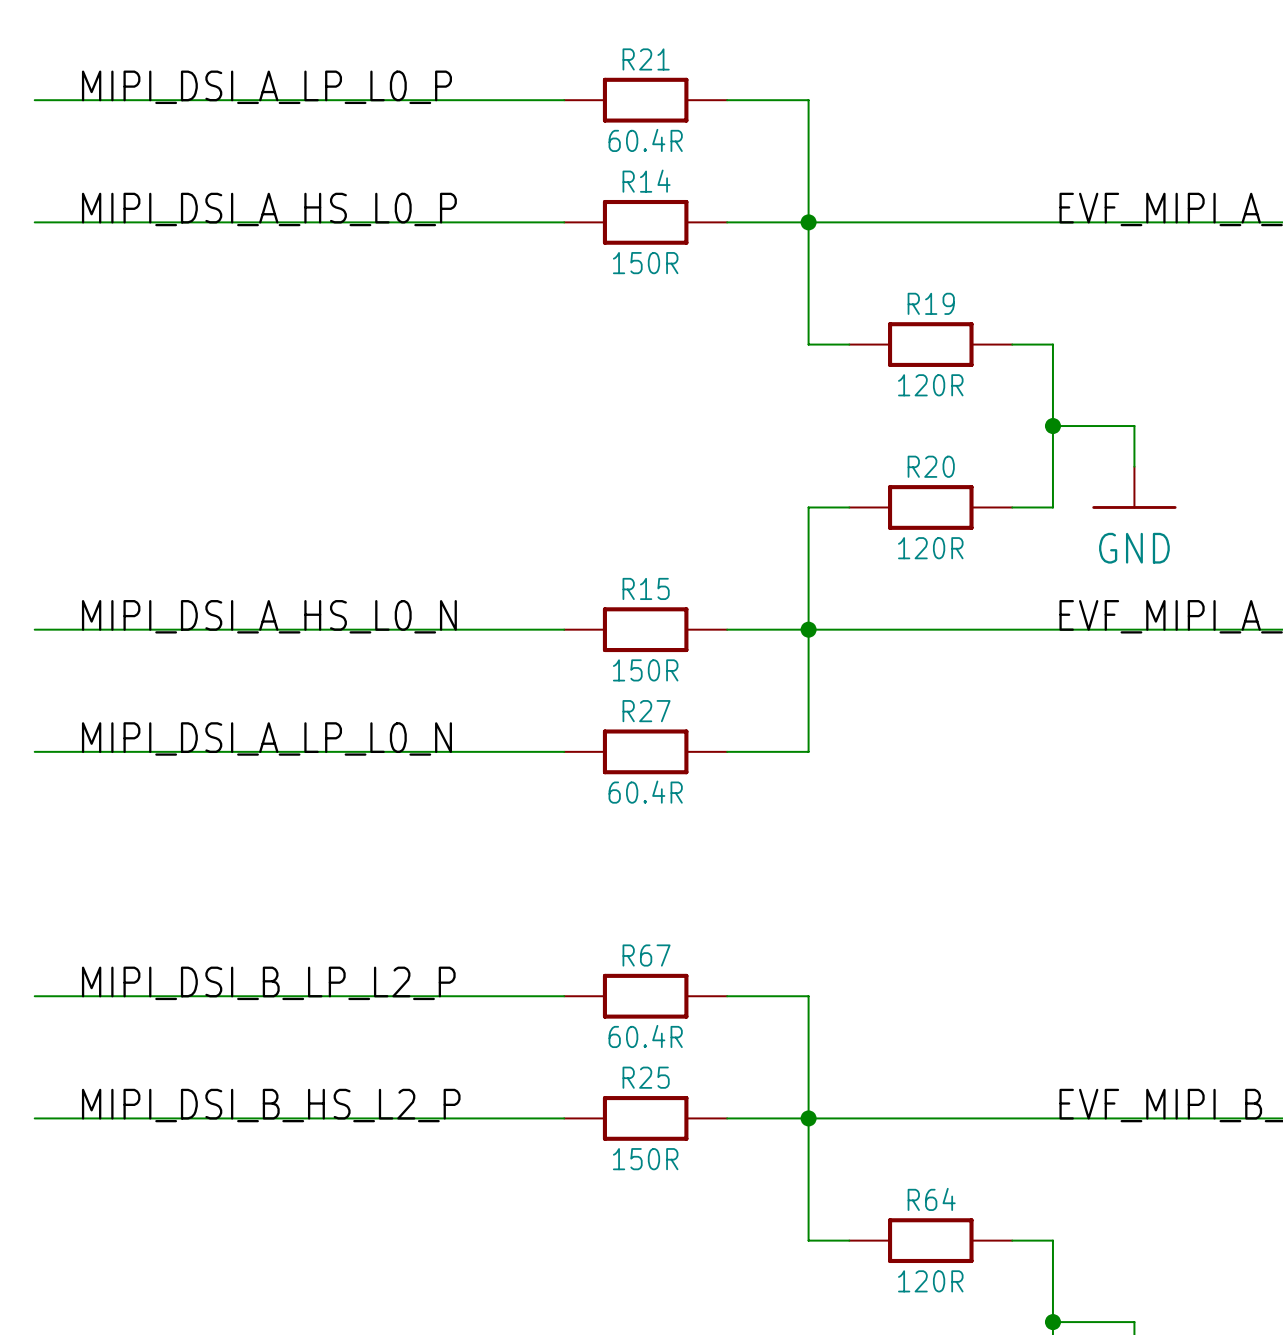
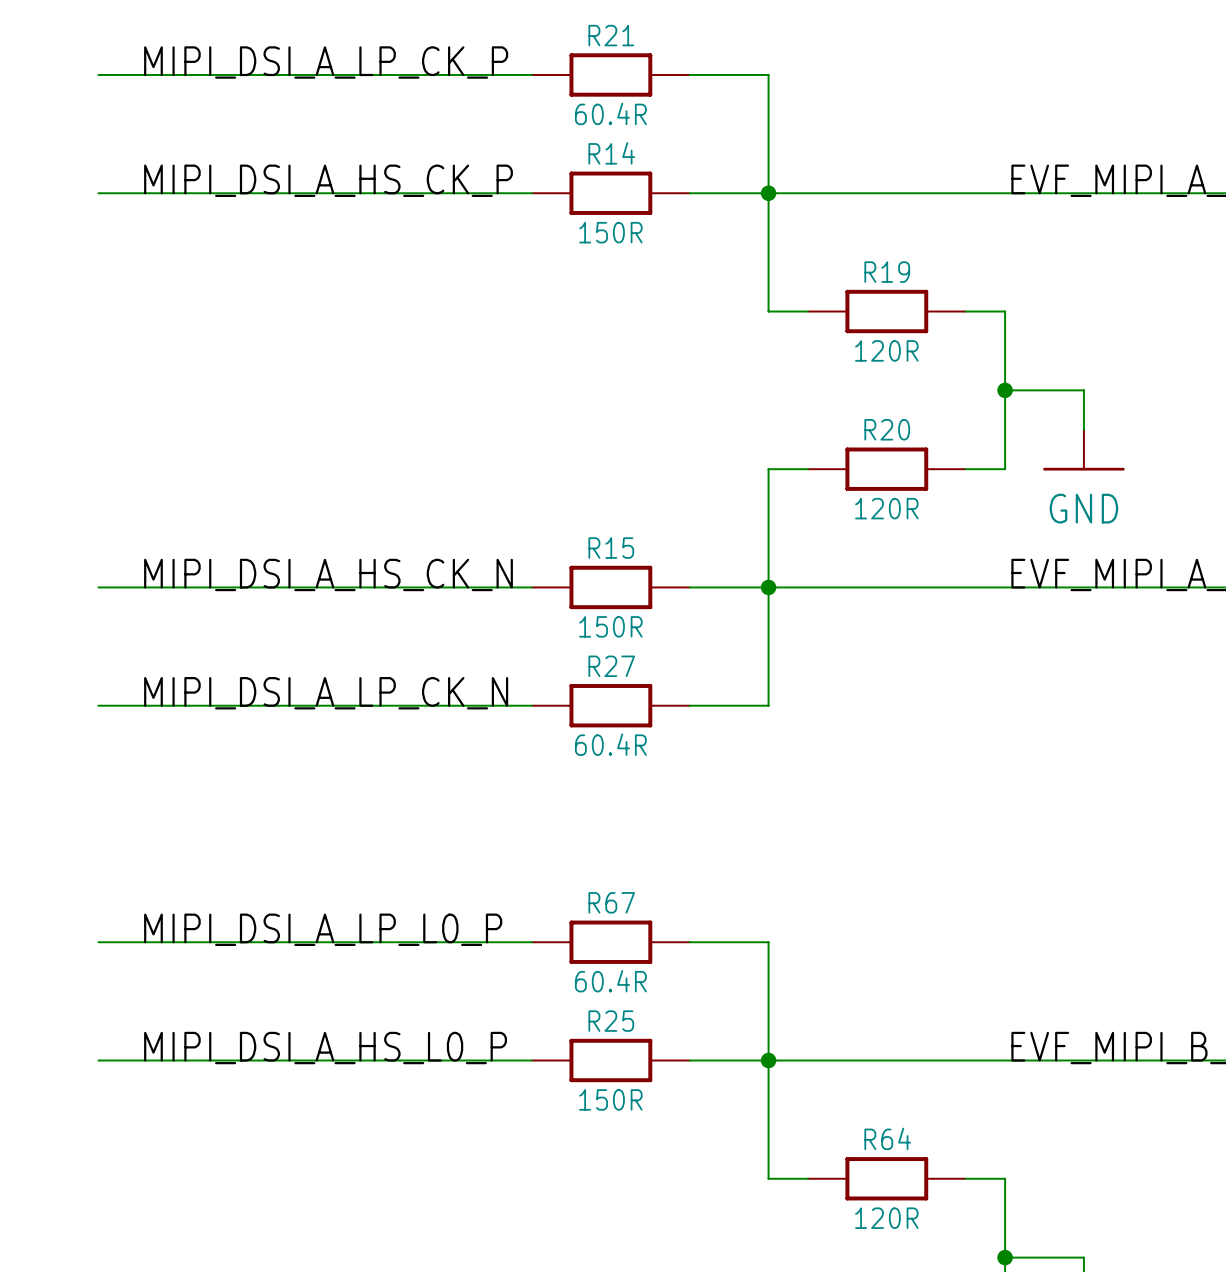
label: MIPI_DSI_A_LP_L0_P (266, 87) -> MIPI_DSI_A_LP_CK_P (326, 62)
wire: (34, 100) (116, 100) -> none
label: MIPI_DSI_A_HS_L0_P (269, 209) -> MIPI_DSI_A_HS_CK_P (328, 180)
wire: (34, 222) (116, 222) -> none
label: MIPI_DSI_A_HS_L0_N (269, 616) -> MIPI_DSI_A_HS_CK_N (328, 574)
wire: (34, 629) (116, 629) -> none
label: MIPI_DSI_A_LP_L0_N (266, 738) -> MIPI_DSI_A_LP_CK_N (326, 693)
wire: (34, 751) (116, 751) -> none
label: MIPI_DSI_B_LP_L2_P (268, 983) -> MIPI_DSI_A_LP_L0_P (323, 929)
wire: (34, 996) (116, 996) -> none
label: MIPI_DSI_B_HS_L2_P (271, 1105) -> MIPI_DSI_A_HS_L0_P (325, 1048)
wire: (34, 1118) (116, 1118) -> none

